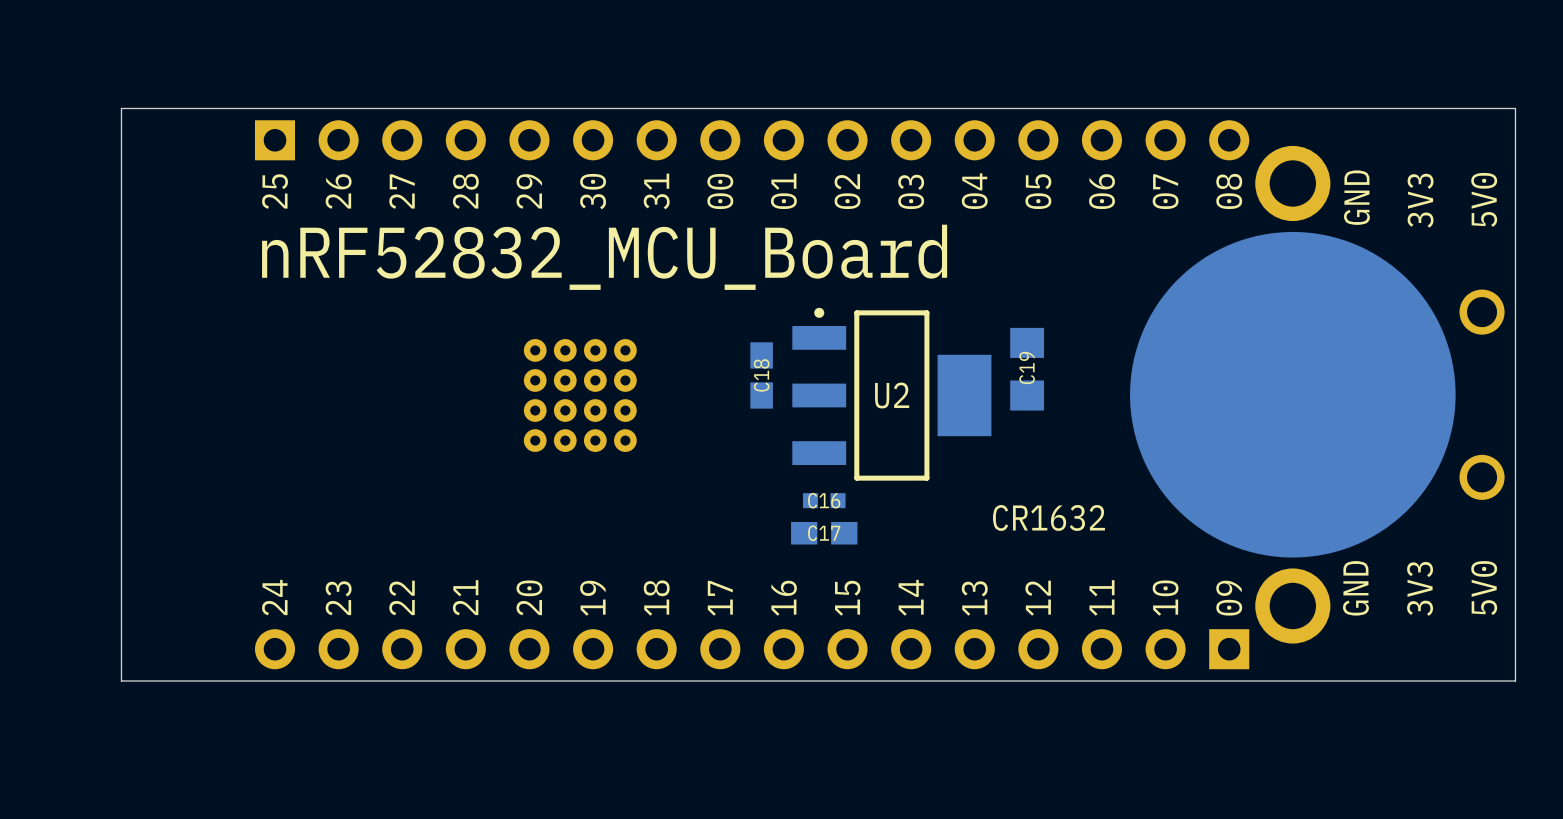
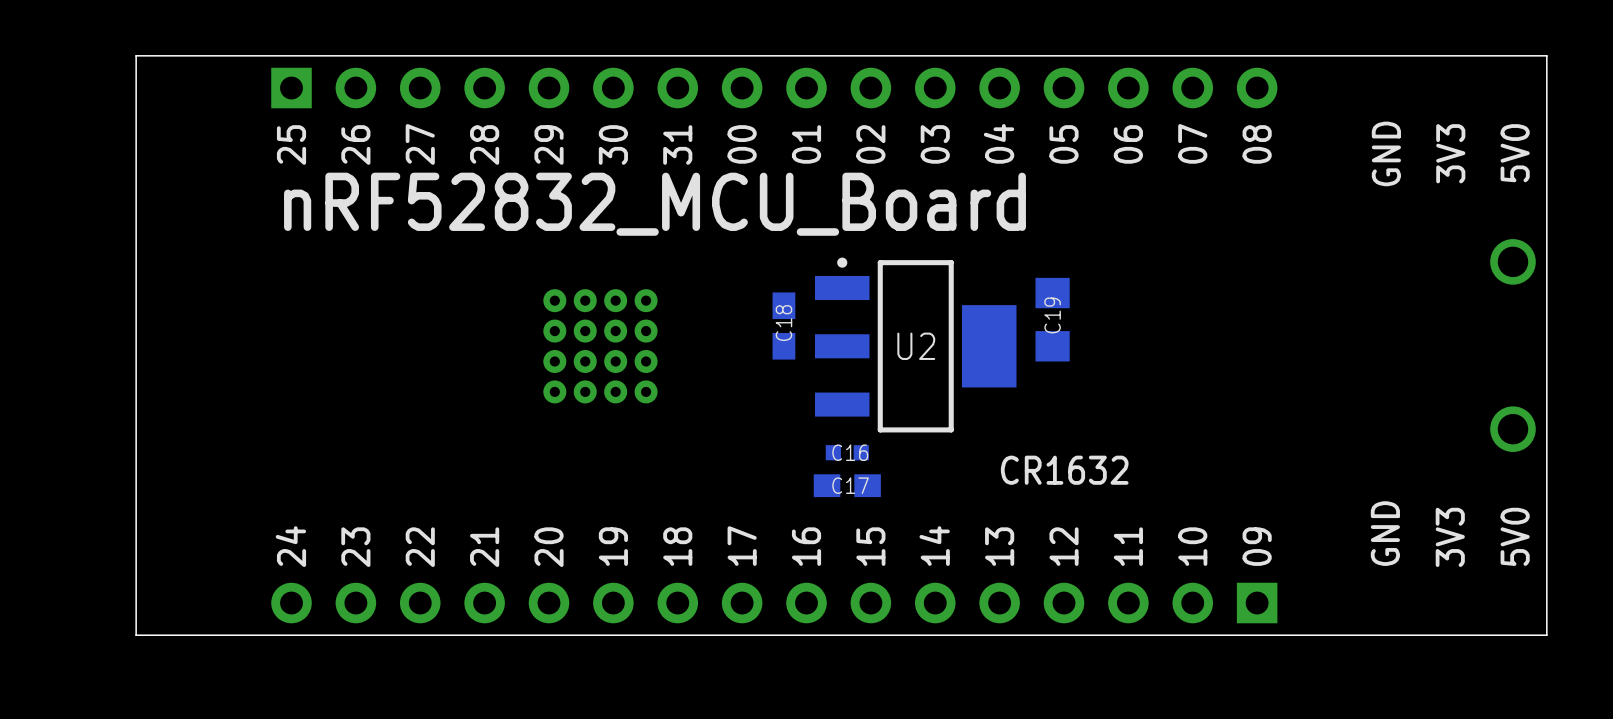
part: (1292, 394) -> none

